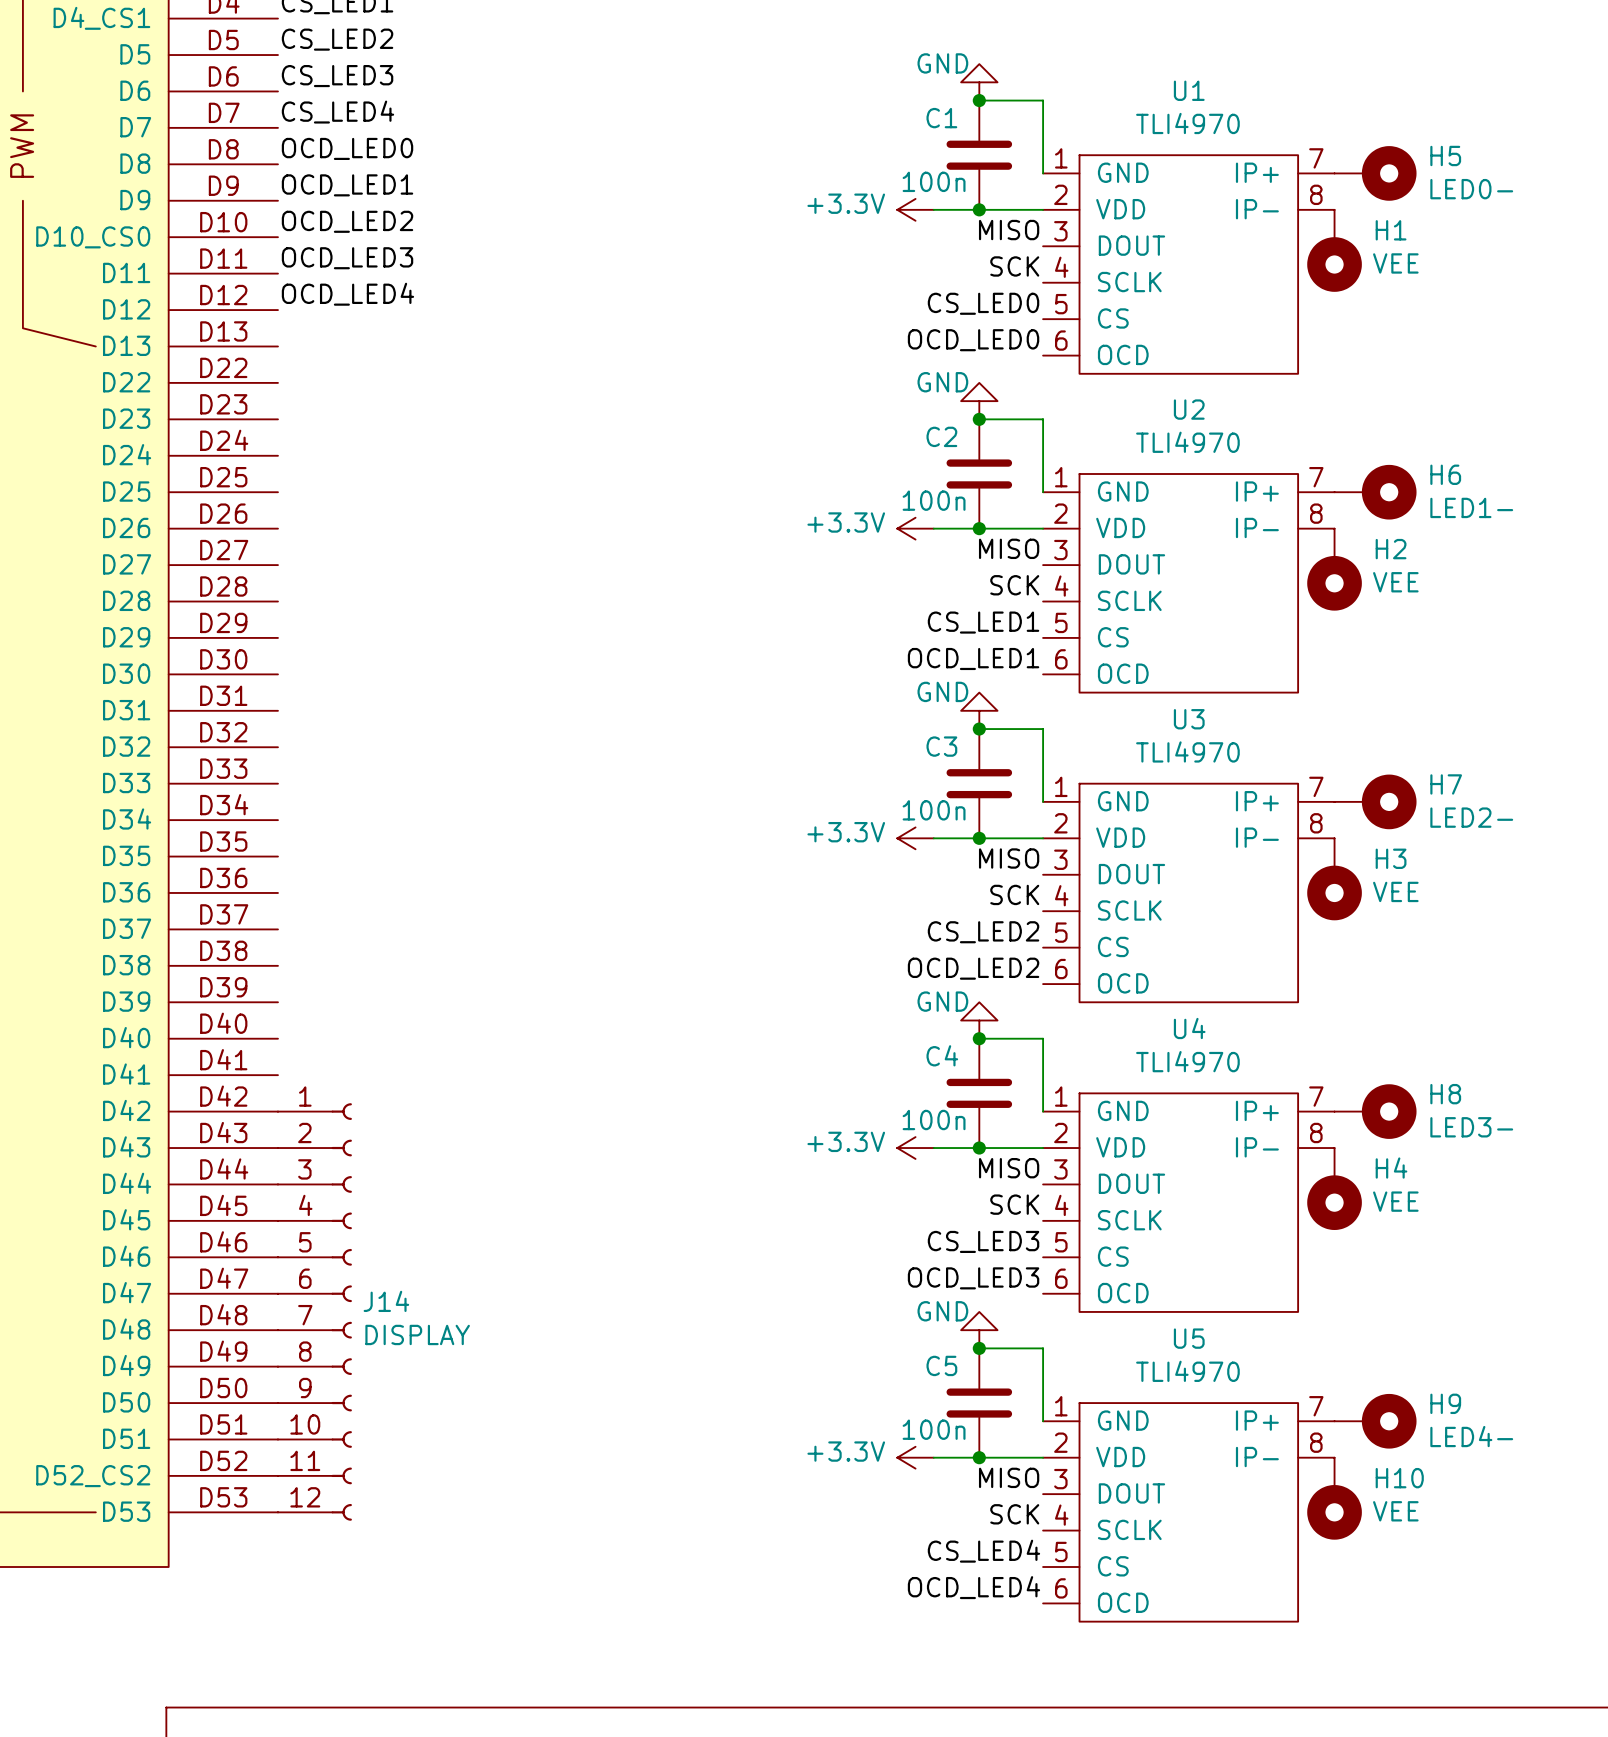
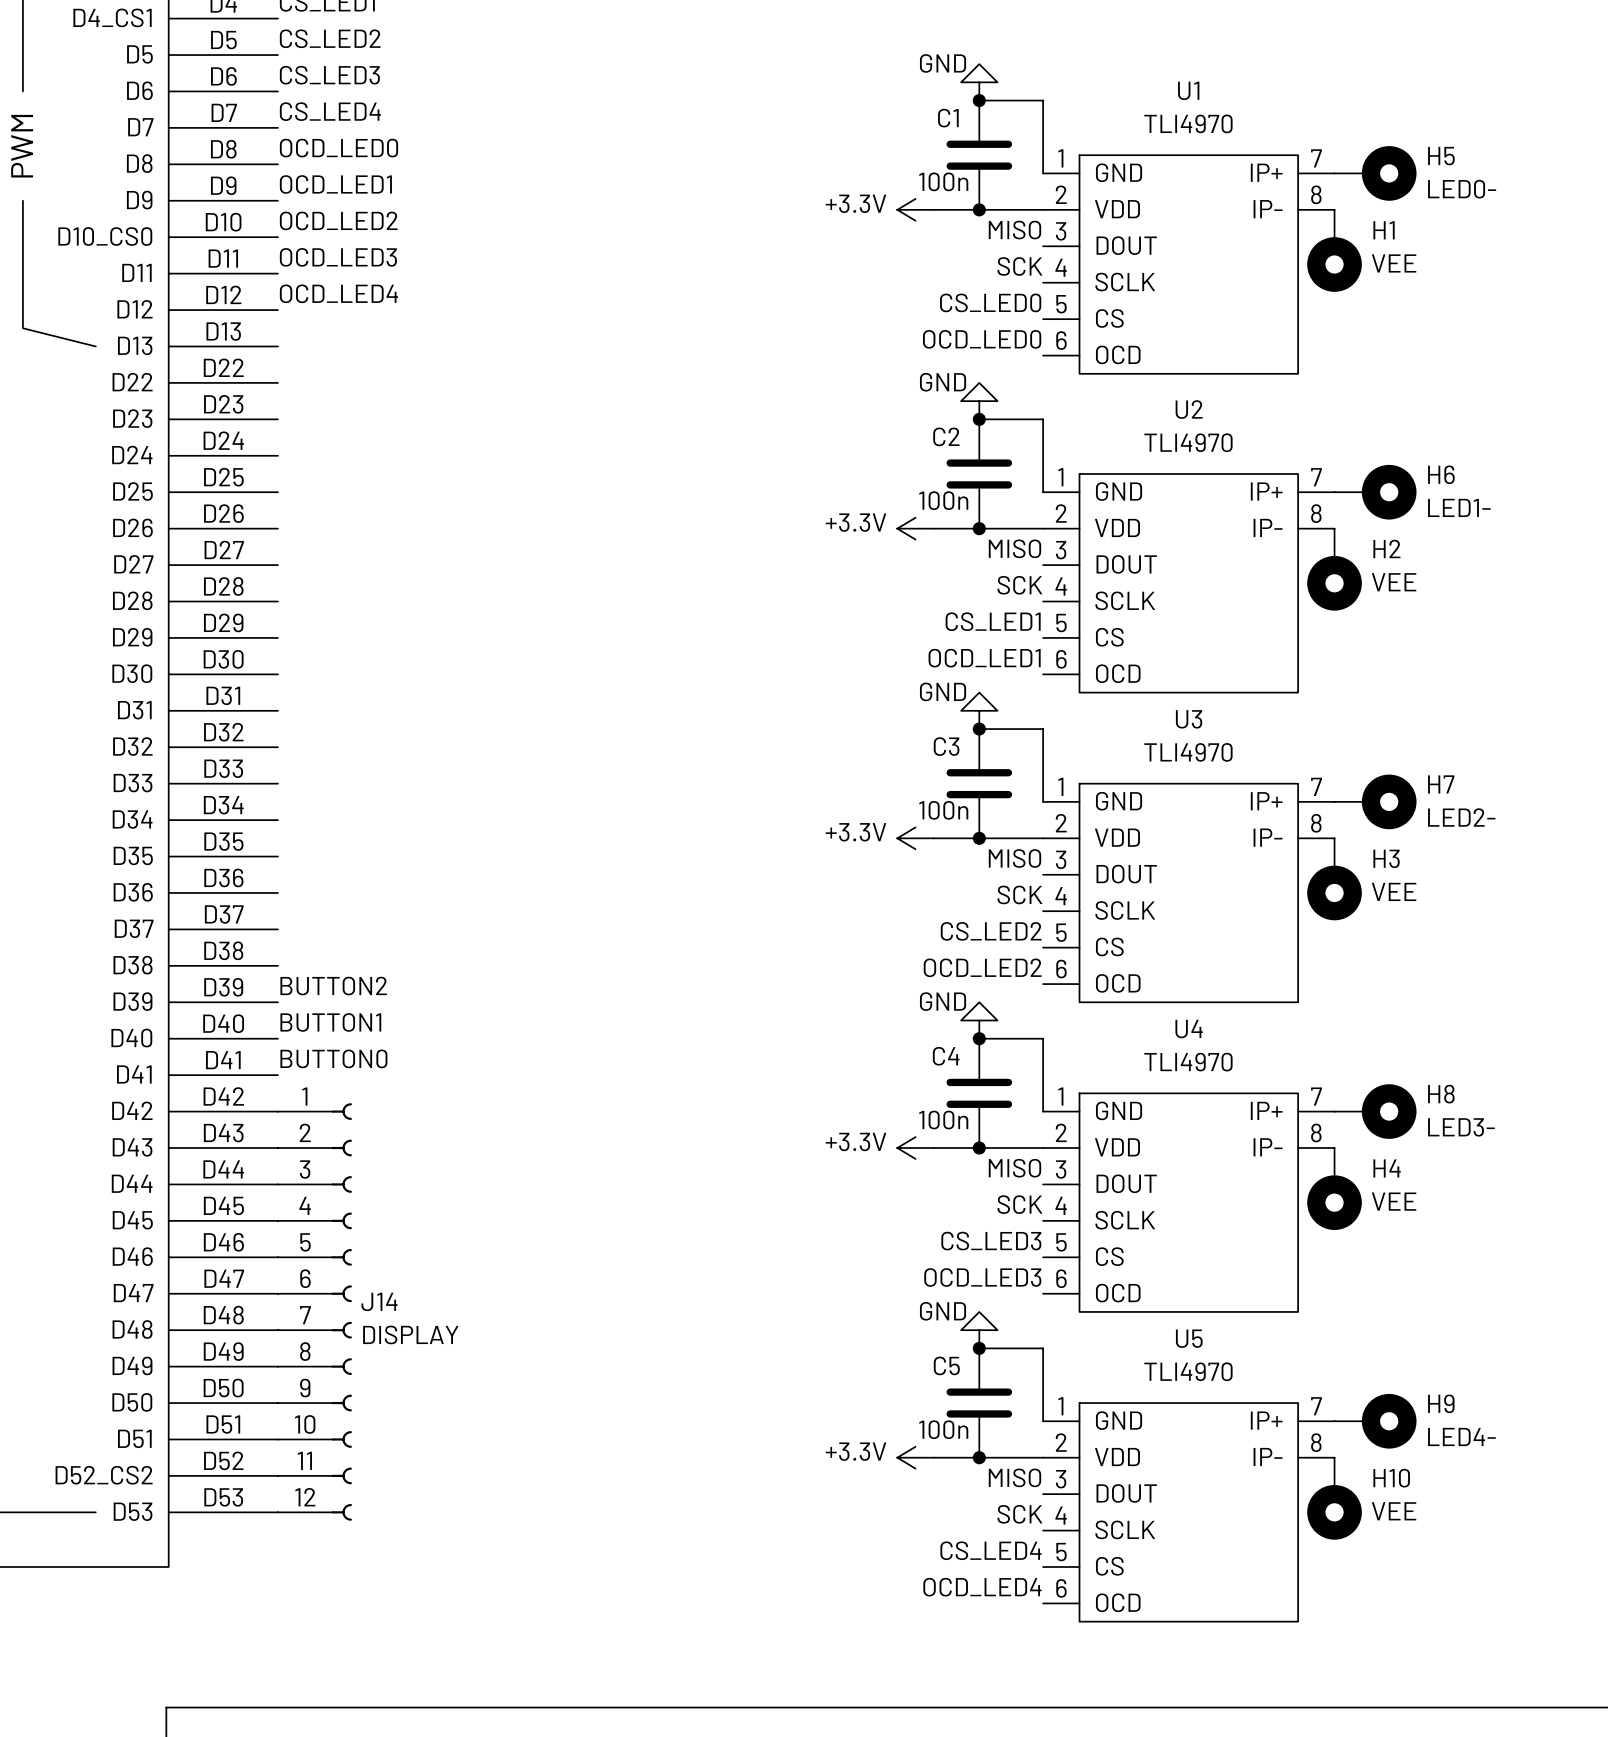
label: none -> BUTTON2 (333, 986)
label: none -> BUTTON1 (330, 1022)
label: none -> BUTTON0 (333, 1058)

